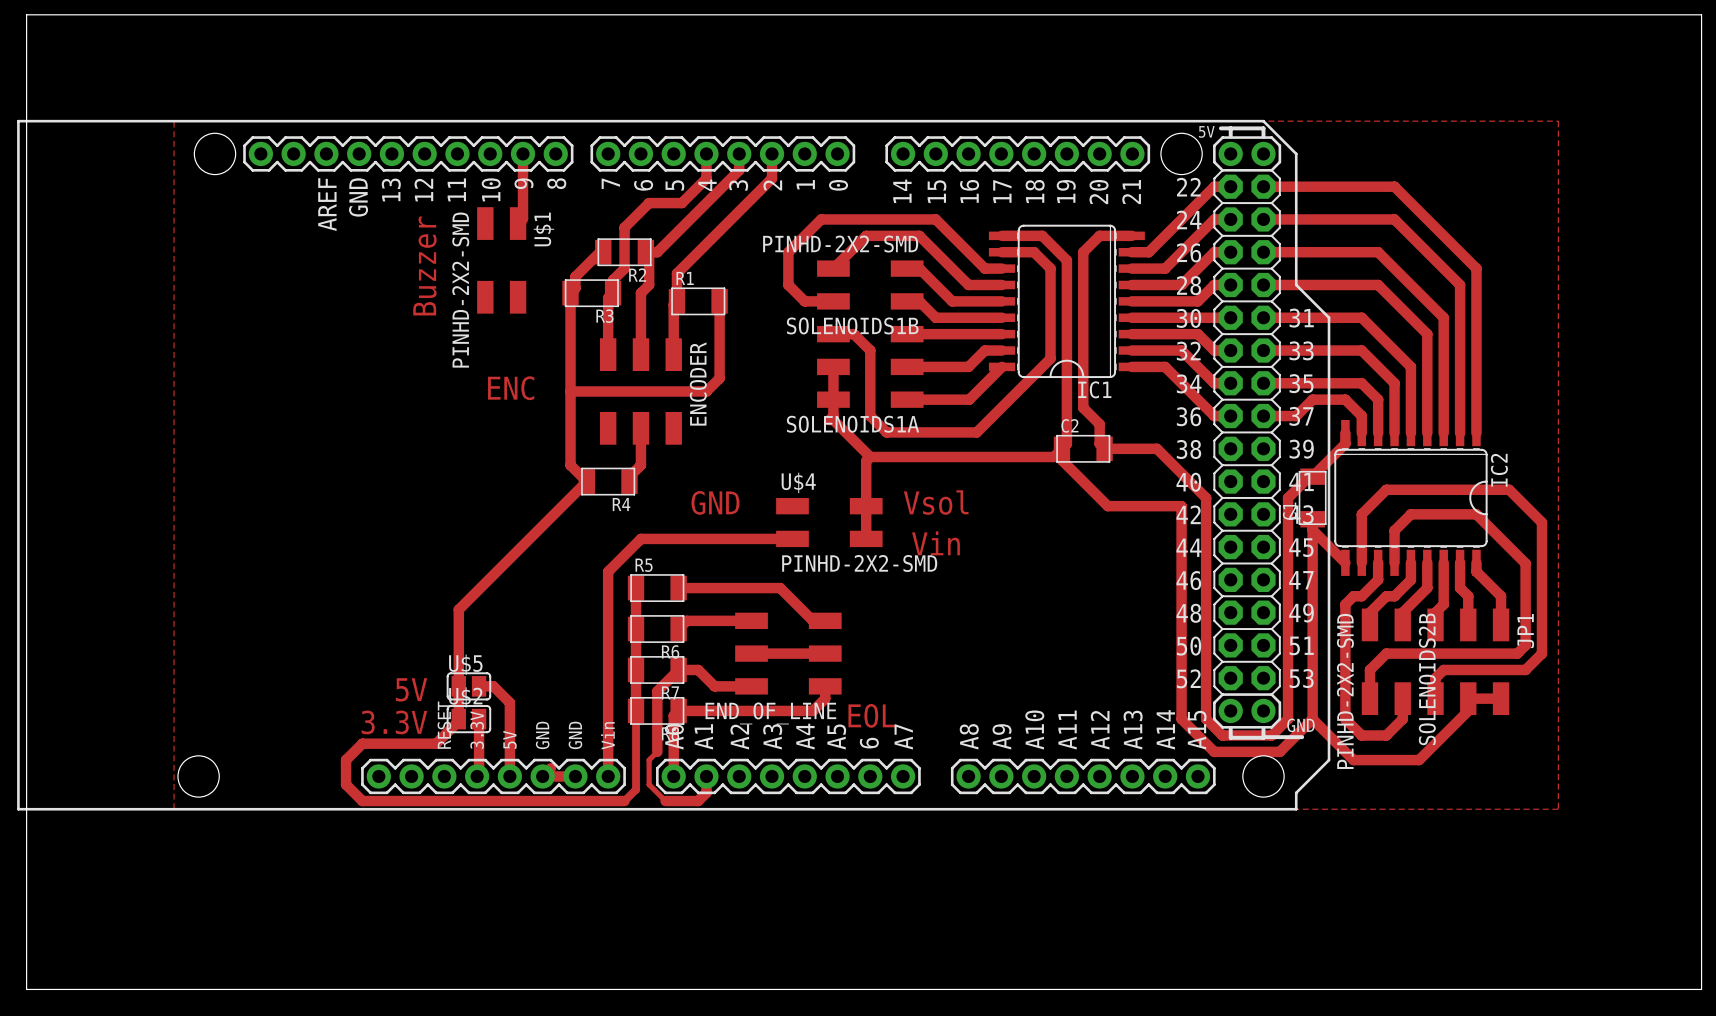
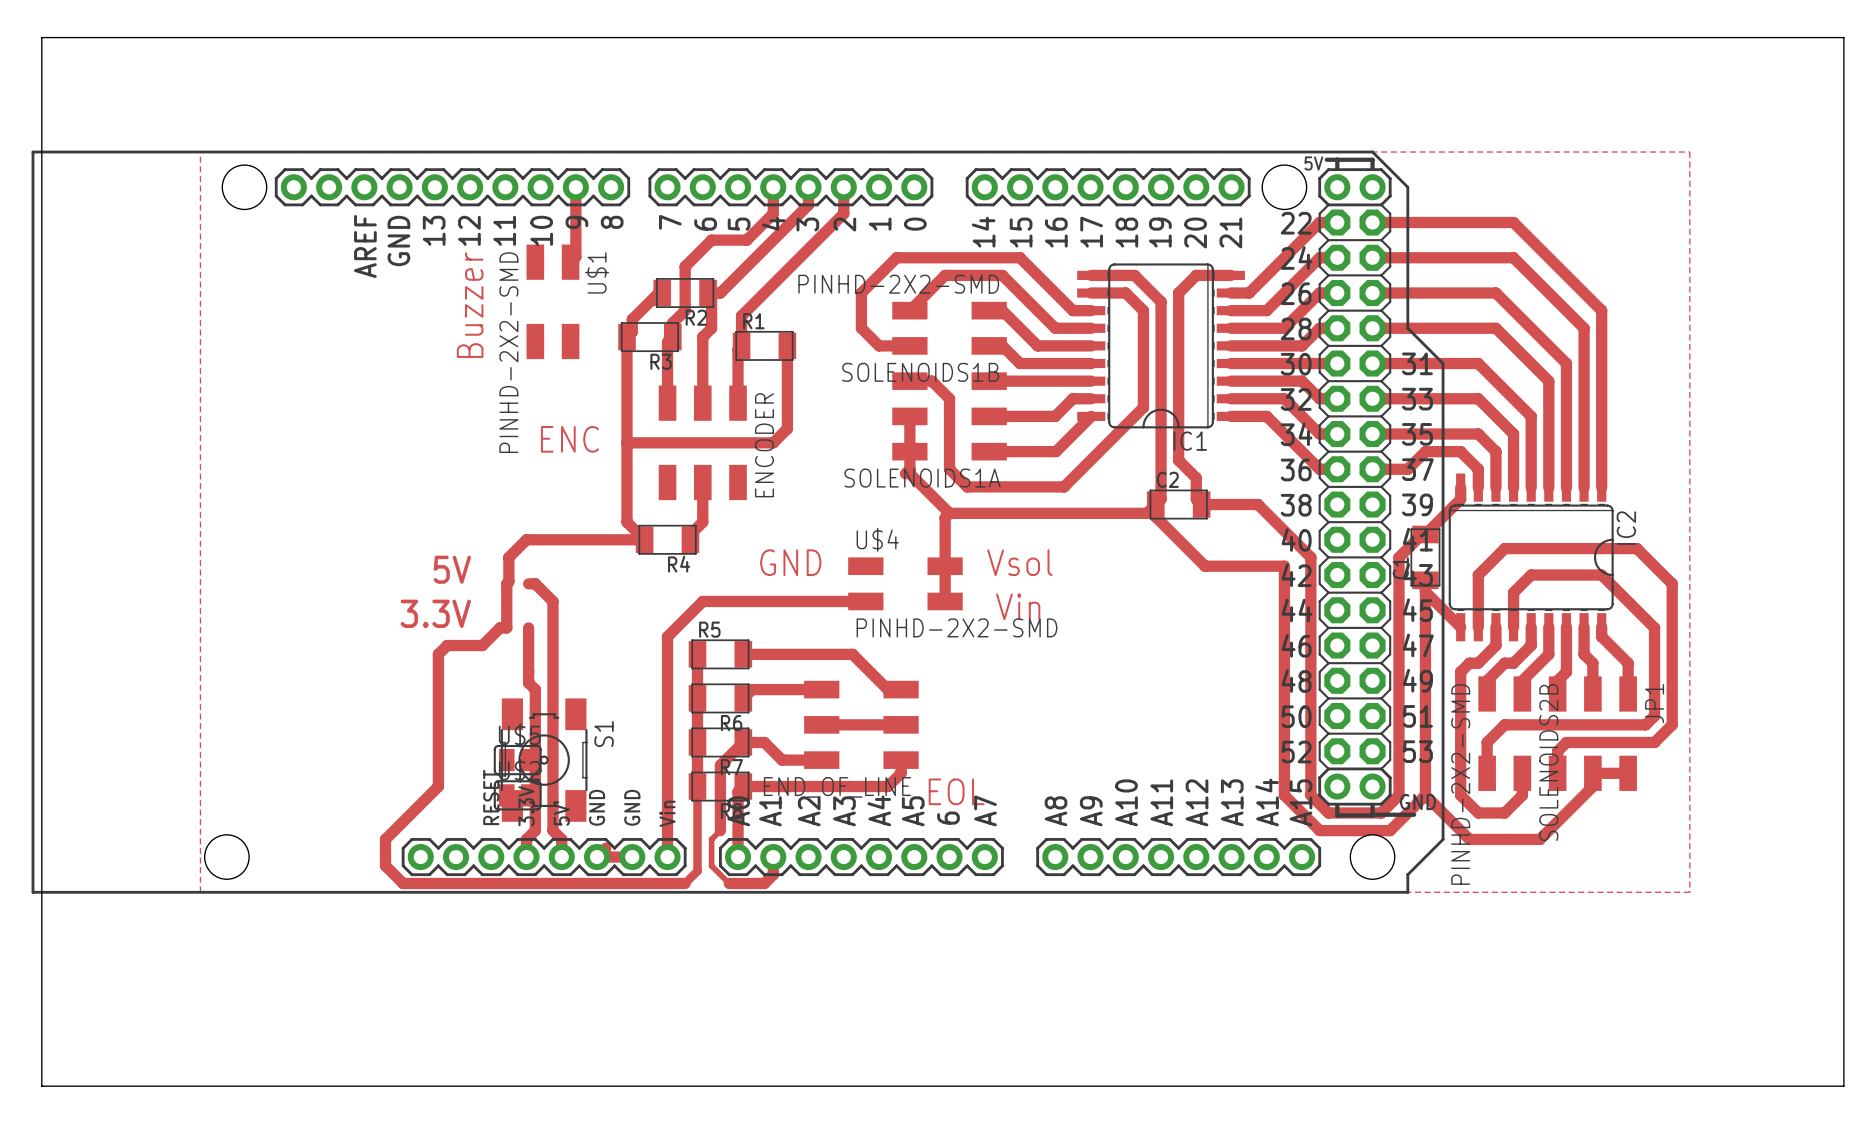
track: (586, 481) (458, 609) (458, 721) (436, 743) (362, 743) -> (644, 539) (526, 539) (508, 557) (506, 627) (500, 627) (482, 645) (447, 645) (438, 654) (438, 786) (403, 821)
track: (479, 686) (493, 686) (509, 702) (509, 760) -> (528, 583) (535, 583) (552, 601) (552, 830) (561, 839)
S1: none -> (544, 760)
text position: 5V (411, 689) -> 5V (452, 569)
track: (479, 719) (479, 774) (477, 776) -> (528, 627) (528, 682) (535, 689) (535, 830) (526, 839) (526, 857)
text position: 3.3V (394, 722) -> 3.3V (435, 613)

